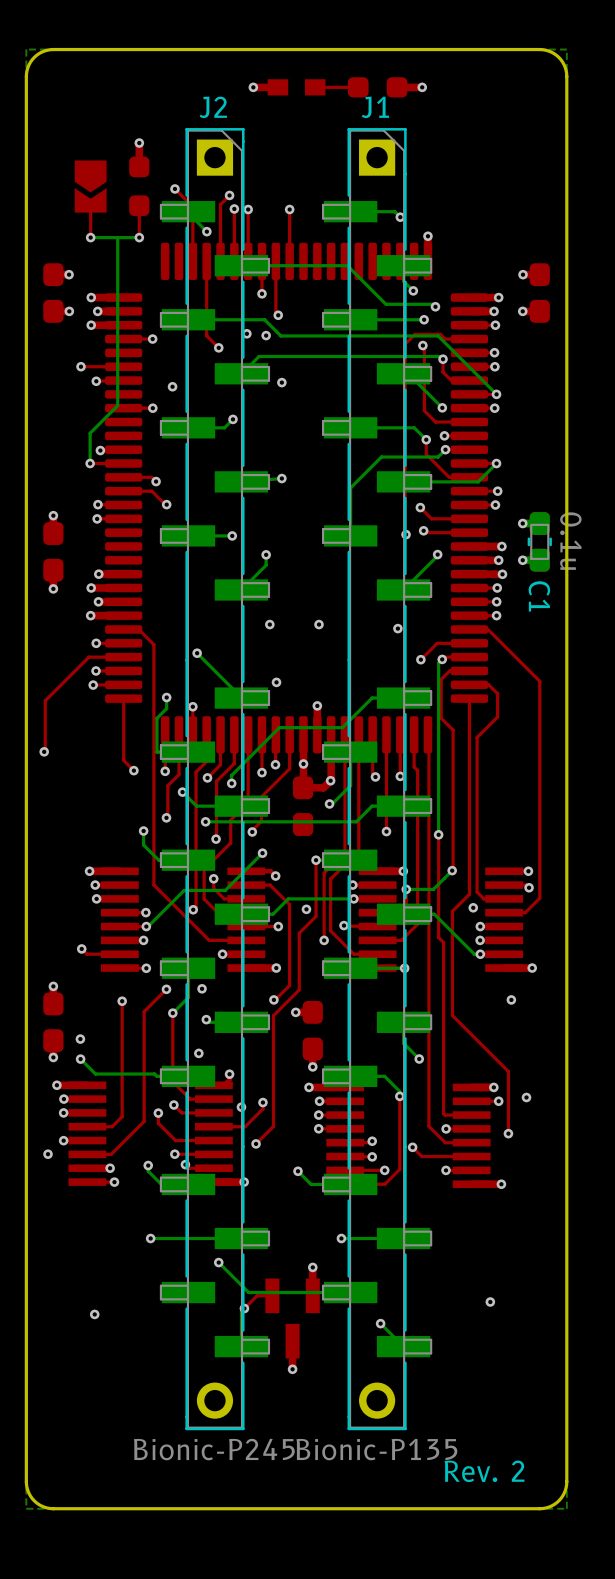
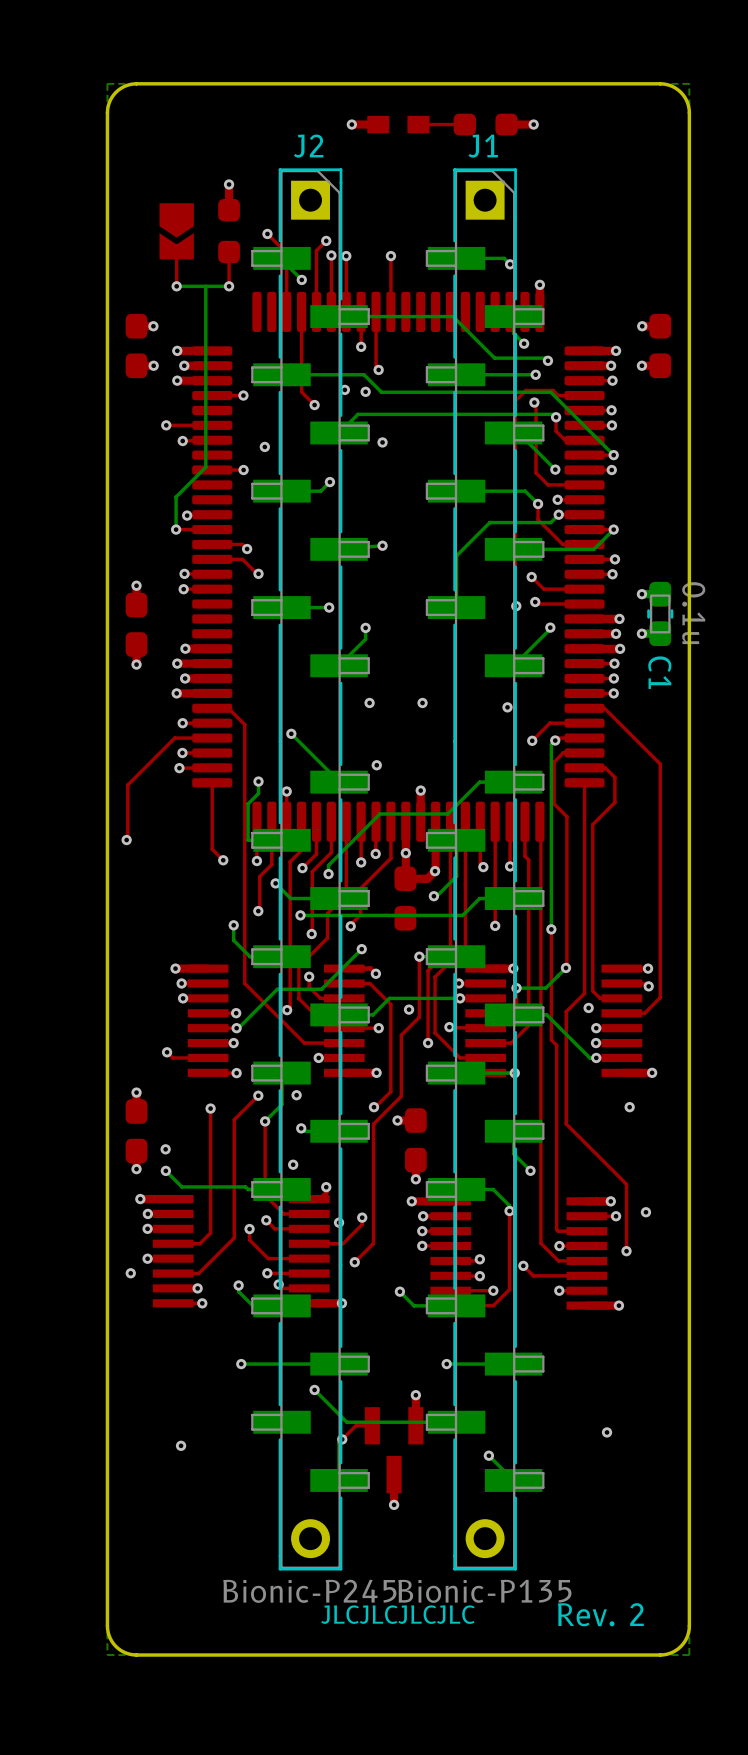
text: none -> JLCJLCJLCJLC (397, 1614)

